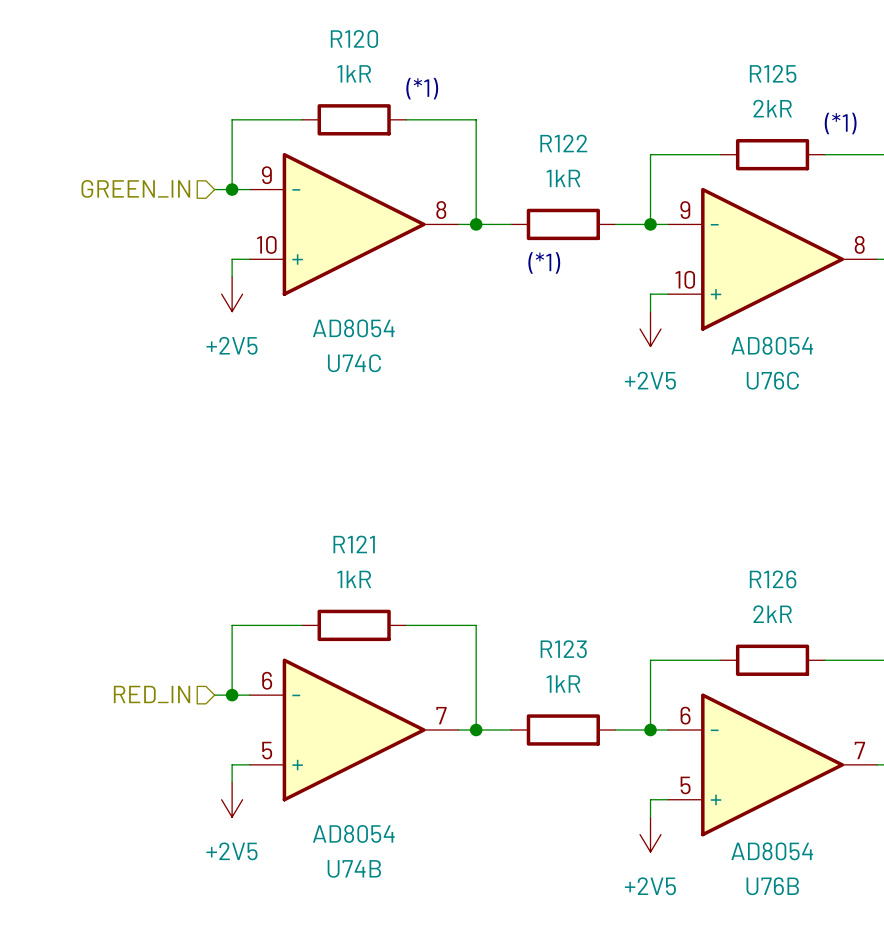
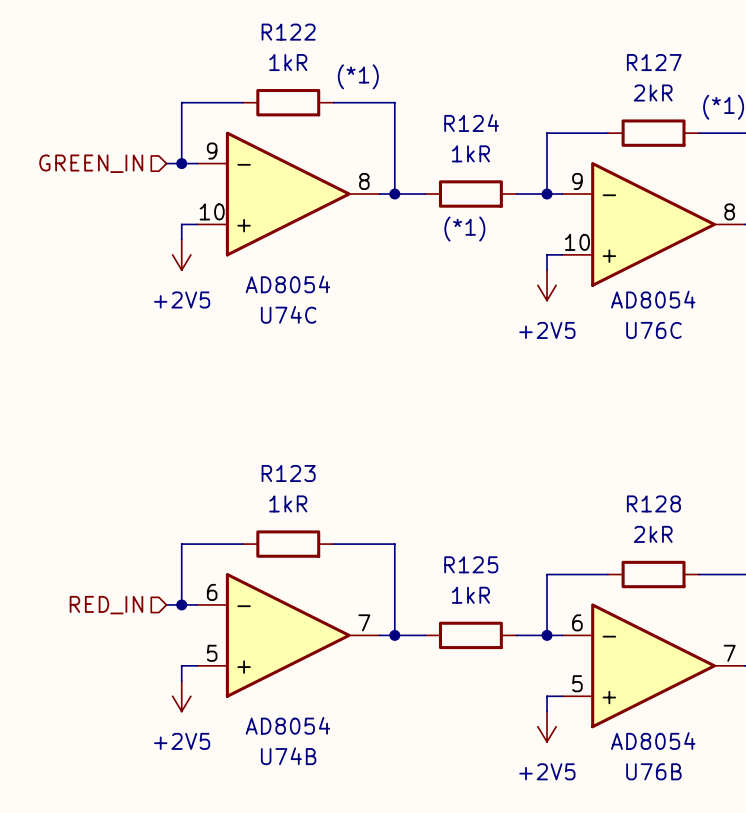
R120 name: R120 (354, 38) -> R122 (288, 32)
R125 name: R125 (773, 73) -> R127 (654, 62)
R122 name: R122 (563, 143) -> R124 (471, 123)
R121 name: R121 (354, 544) -> R123 (288, 473)
R126 name: R126 (773, 579) -> R128 (653, 503)
R123 name: R123 (563, 649) -> R125 (471, 564)

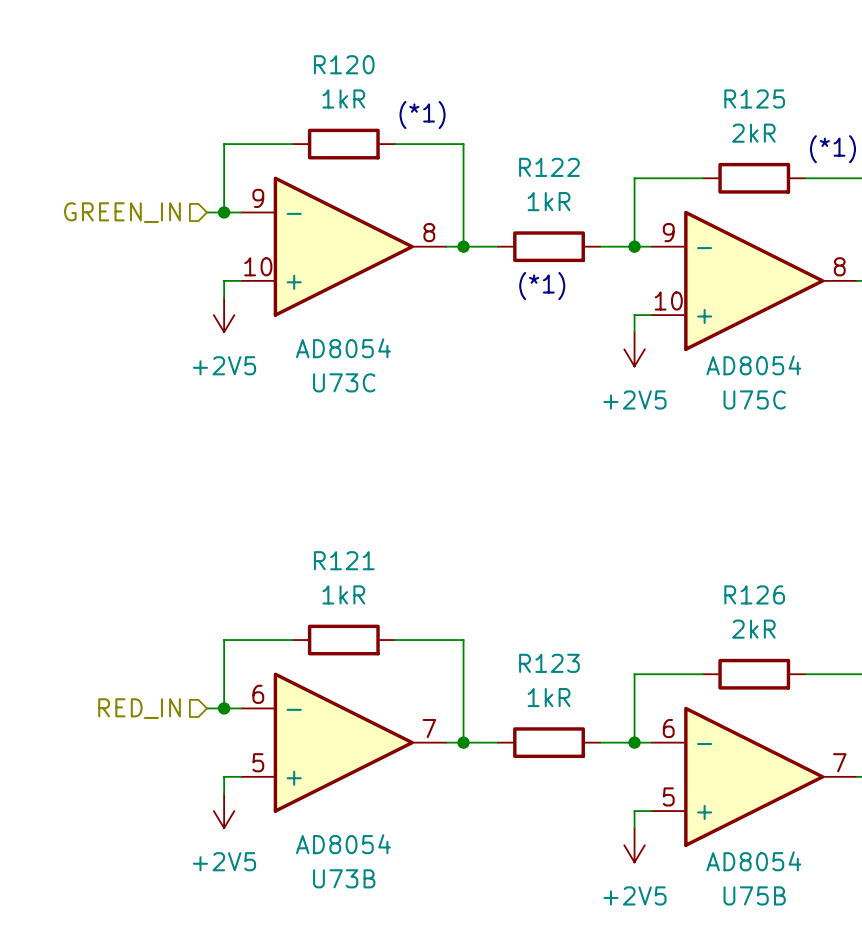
R122 name: R122 (288, 32) -> R120 (344, 64)
R127 name: R127 (654, 62) -> R125 (754, 98)
R124 name: R124 (471, 123) -> R122 (549, 167)
U74C name: U74C (288, 314) -> U73C (344, 382)
U76C name: U76C (653, 330) -> U75C (754, 399)
R123 name: R123 (288, 473) -> R121 (344, 560)
R128 name: R128 (653, 503) -> R126 (754, 594)
R125 name: R125 (471, 564) -> R123 (549, 663)
U74B name: U74B (288, 756) -> U73B (344, 878)
U76B name: U76B (653, 771) -> U75B (754, 895)

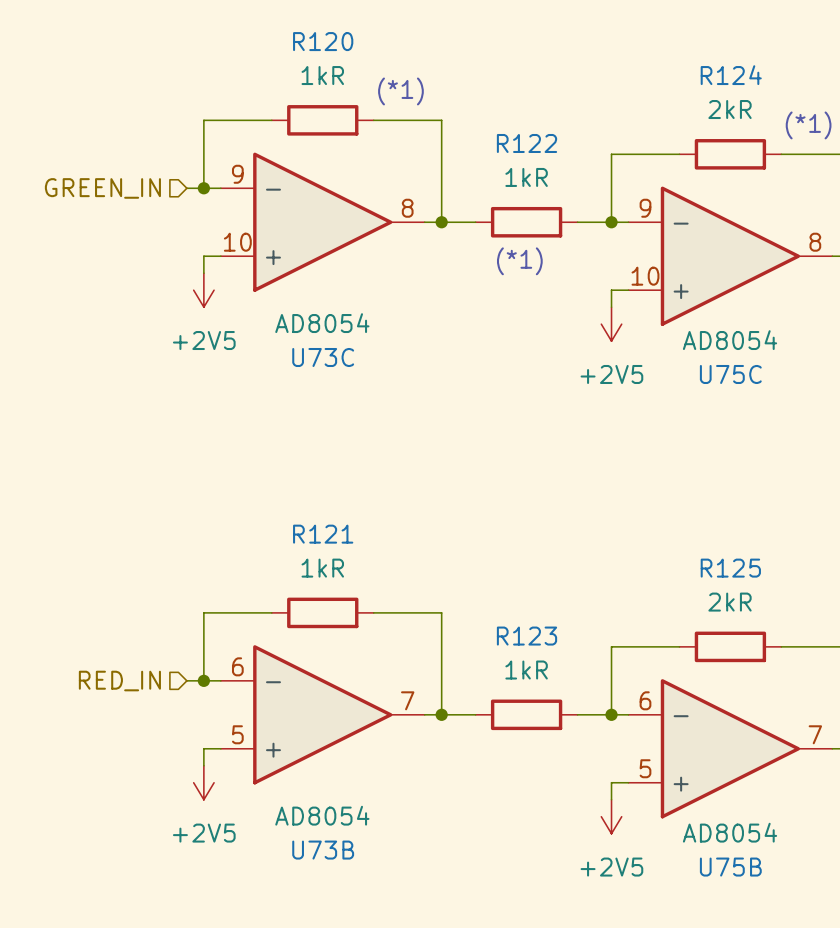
R125 name: R125 (754, 98) -> R124 (731, 75)
R126 name: R126 (754, 594) -> R125 (730, 568)

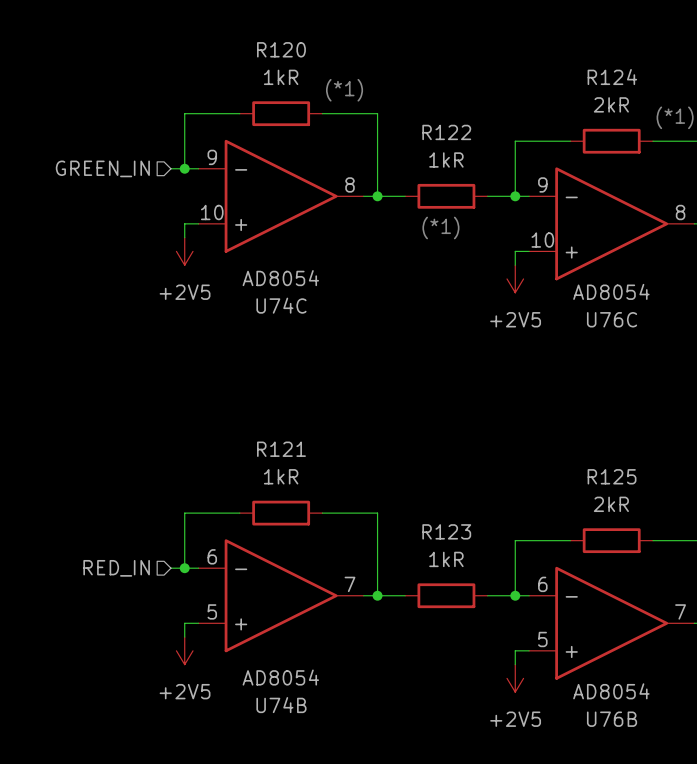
U73C name: U73C (323, 357) -> U74C (281, 305)
U75C name: U75C (730, 374) -> U76C (612, 319)
U73B name: U73B (323, 850) -> U74B (281, 705)
U75B name: U75B (730, 867) -> U76B (612, 719)

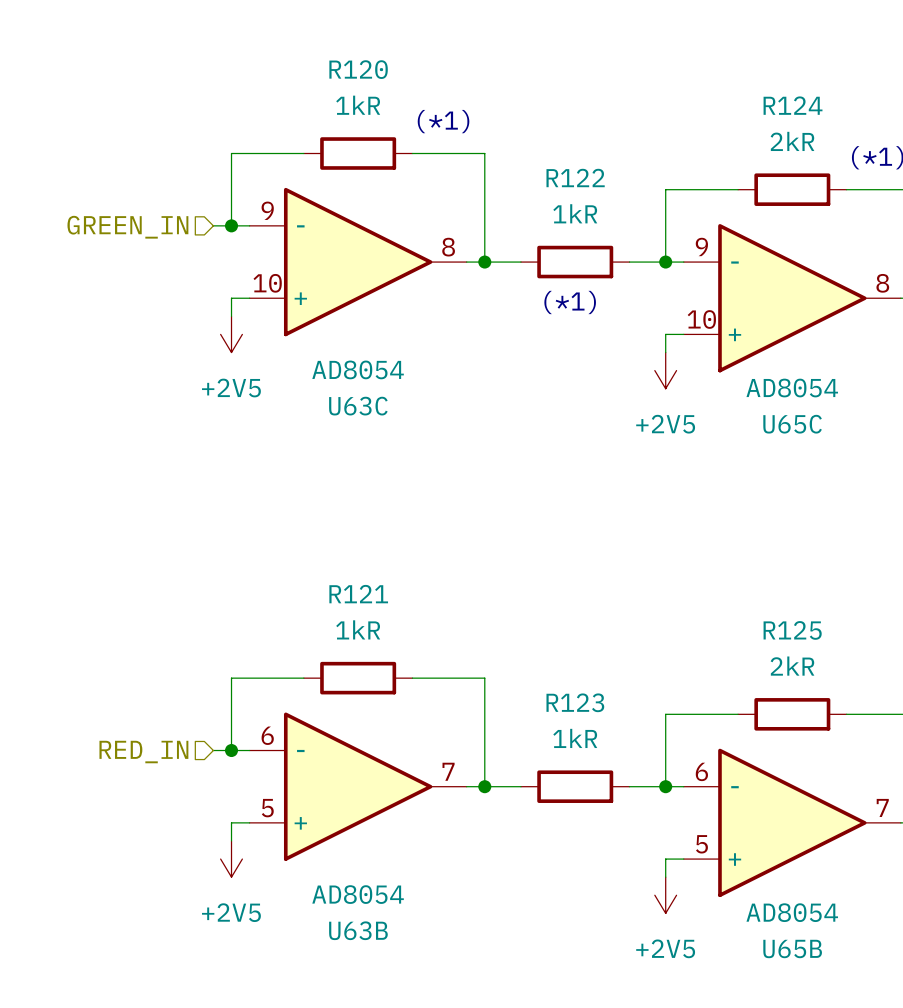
U74C name: U74C (281, 305) -> U63C (358, 406)
U76C name: U76C (612, 319) -> U65C (792, 424)
U74B name: U74B (281, 705) -> U63B (358, 930)
U76B name: U76B (612, 719) -> U65B (792, 949)

